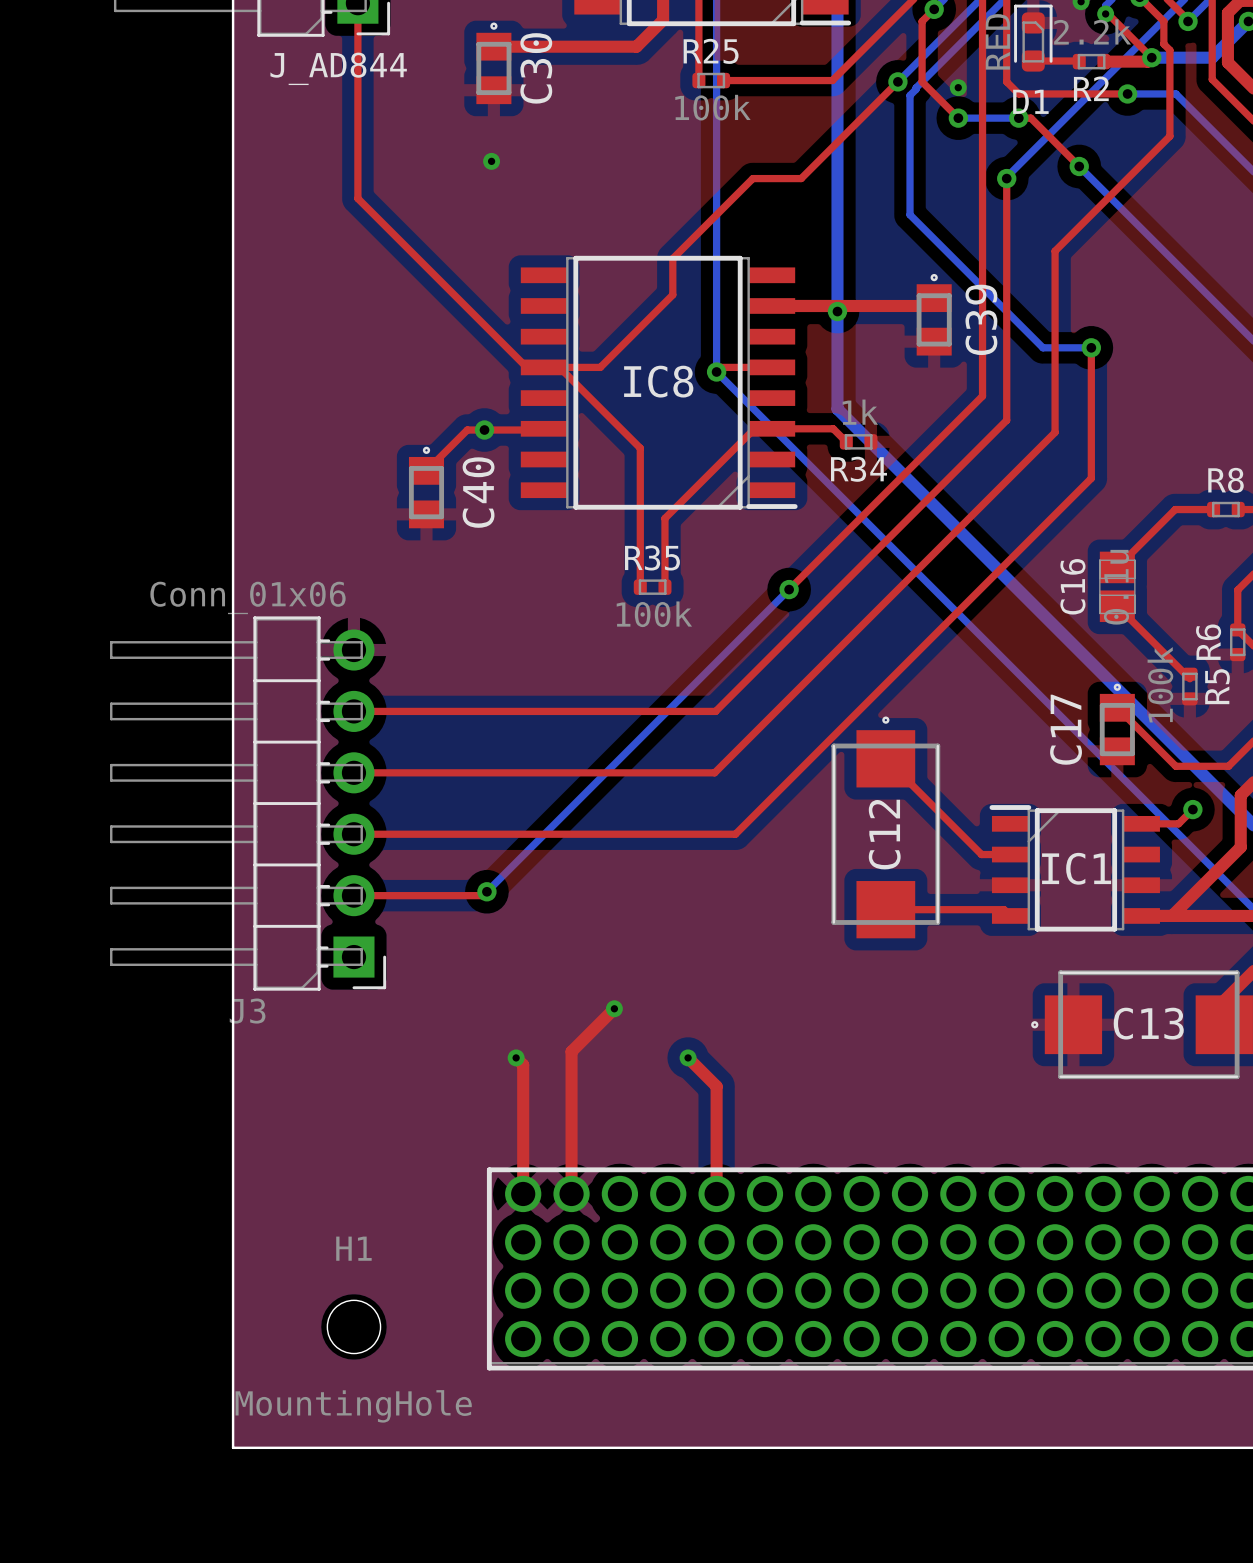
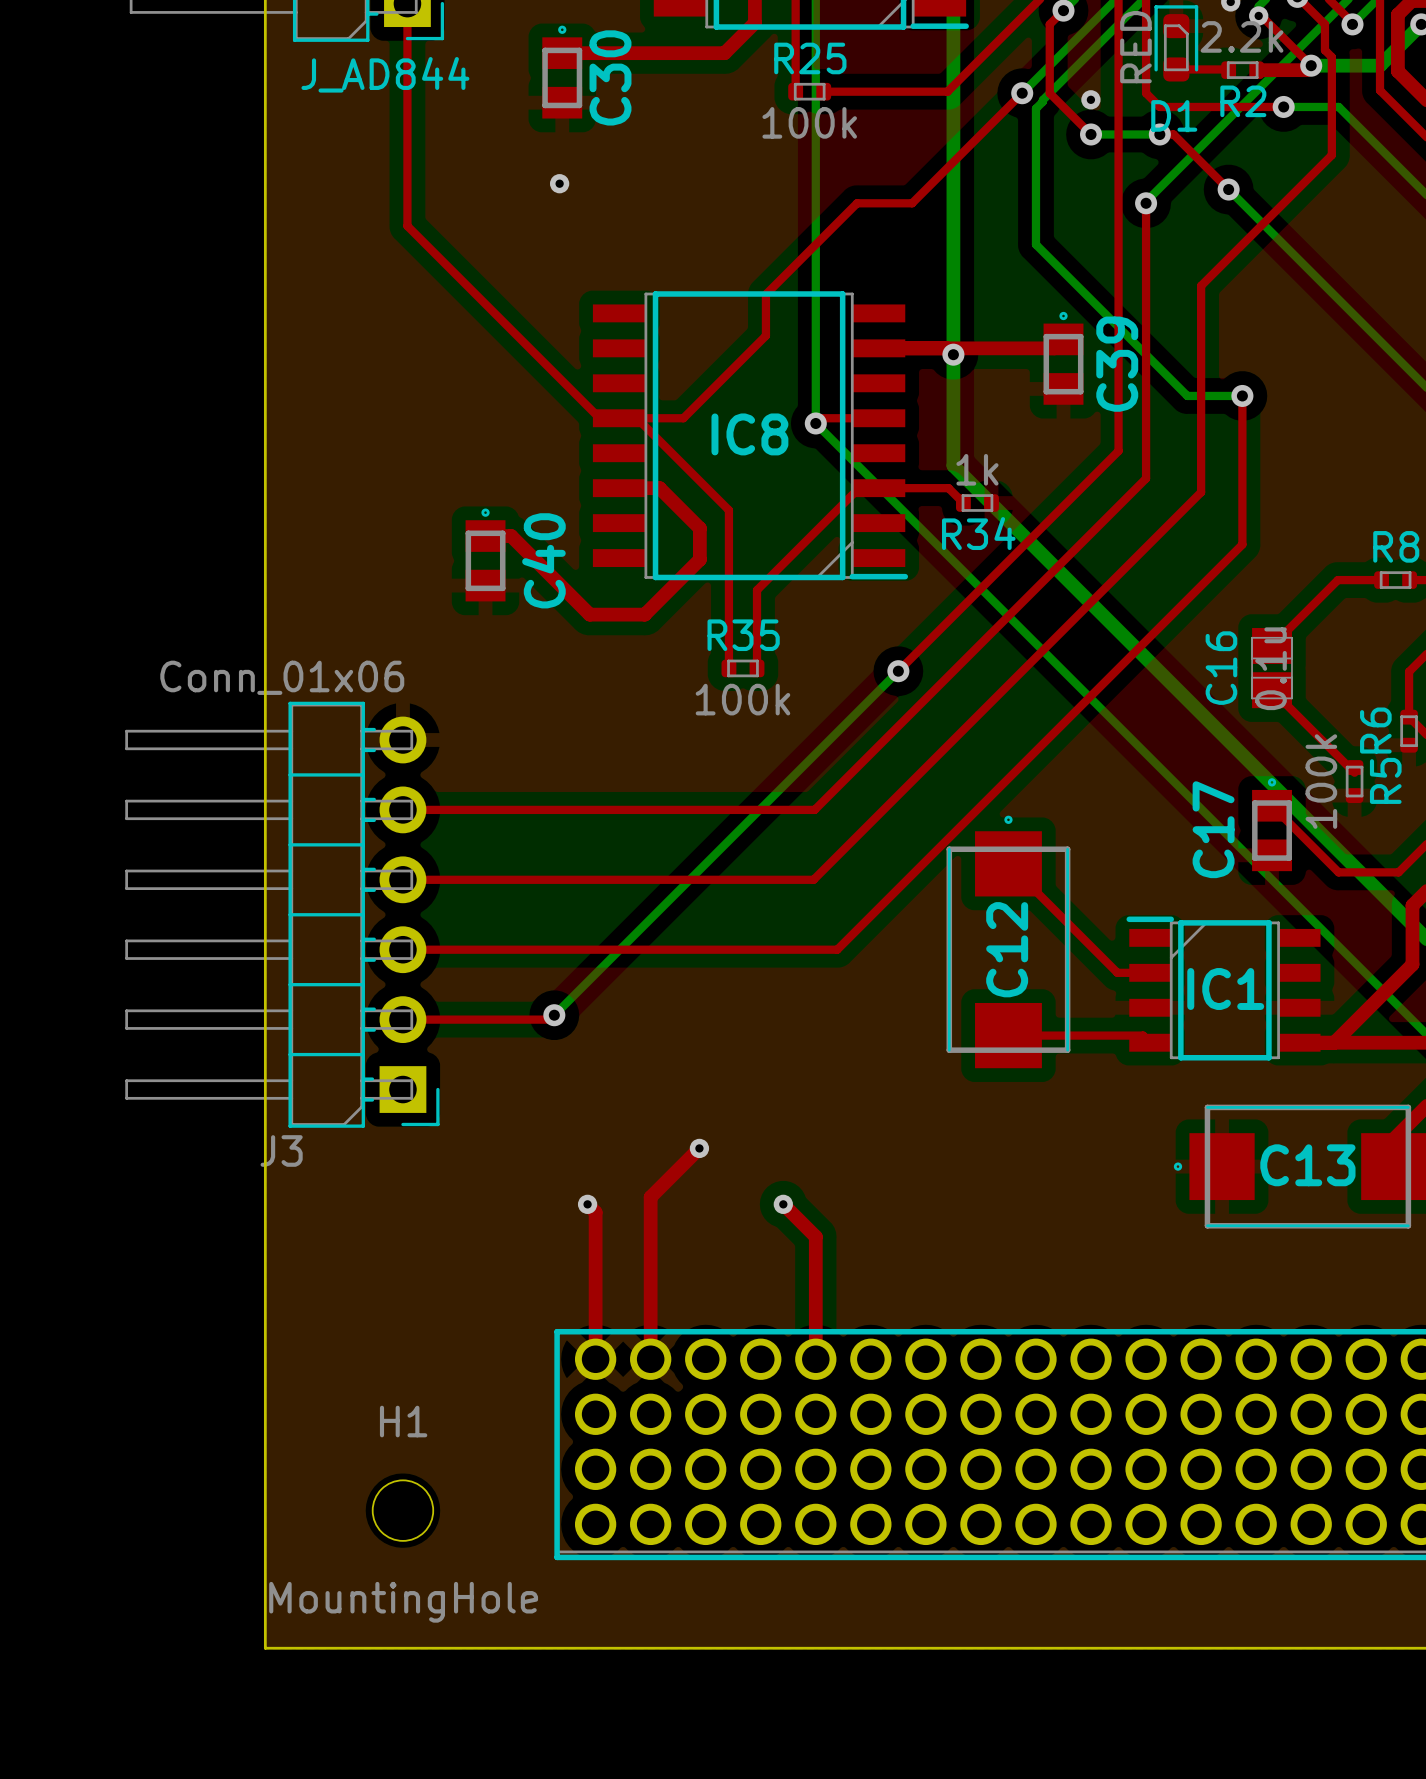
top track: (544, 428) (467, 430) (426, 470) -> (619, 488) (659, 488) (699, 528) (699, 559) (644, 614) (589, 614) (511, 536) (481, 536)
via: (484, 430) -> none
top track: (1192, 809) (1178, 823) (1141, 823) -> none
via: (1192, 809) -> none

